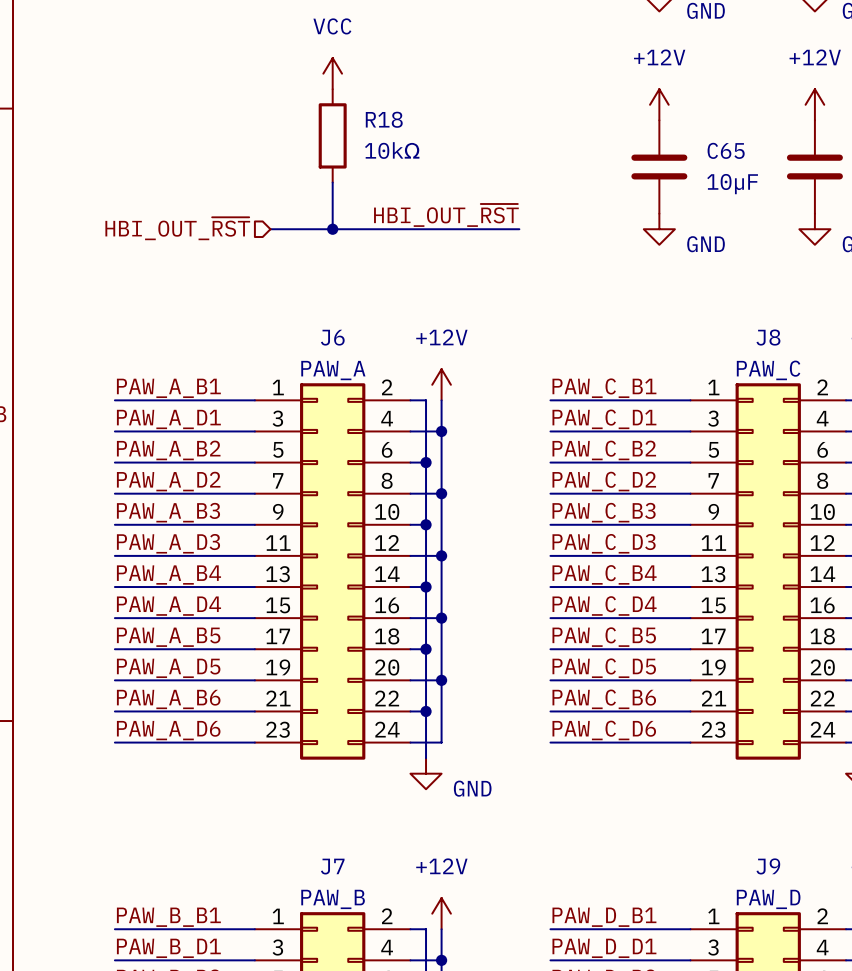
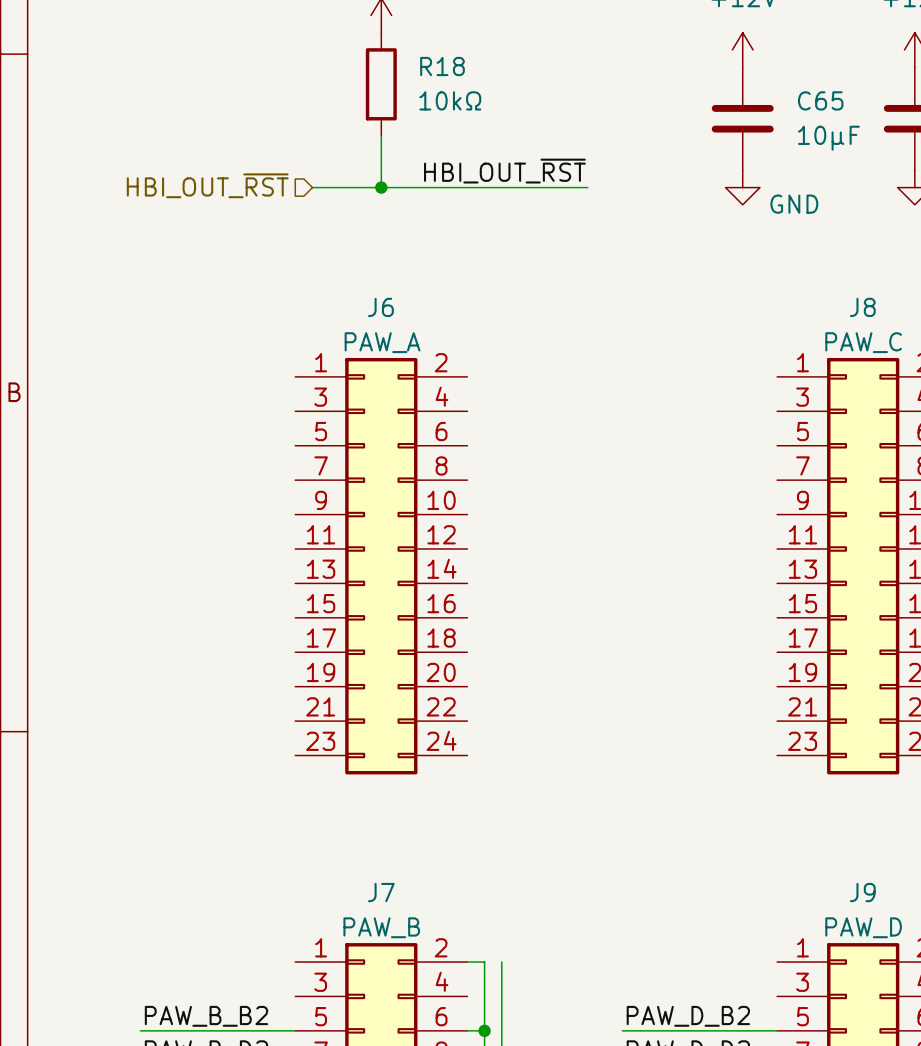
power symbol: +12V (441, 384) -> none
label: PAW_A_B1 (168, 388) -> none
label: PAW_C_B1 (604, 388) -> none
wire: (114, 400) (254, 400) -> none
wire: (410, 400) (426, 400) (426, 758) -> none
wire: (441, 400) (441, 742) (410, 742) -> none
wire: (550, 400) (690, 400) -> none
label: PAW_A_D1 (168, 419) -> none
label: PAW_C_D1 (604, 419) -> none
wire: (114, 431) (254, 431) -> none
wire: (410, 431) (441, 431) -> none
junction: (441, 431) -> none
wire: (550, 431) (690, 431) -> none
label: PAW_A_B2 (168, 450) -> none
label: PAW_C_B2 (604, 450) -> none
wire: (114, 462) (254, 462) -> none
wire: (410, 462) (426, 462) -> none
junction: (426, 462) -> none
wire: (550, 462) (690, 462) -> none
label: PAW_A_D2 (168, 481) -> none
label: PAW_C_D2 (604, 481) -> none
wire: (114, 493) (254, 493) -> none
wire: (410, 493) (441, 493) -> none
junction: (441, 493) -> none
wire: (550, 493) (690, 493) -> none
label: PAW_A_B3 (168, 512) -> none
label: PAW_C_B3 (604, 512) -> none
wire: (114, 524) (254, 524) -> none
wire: (410, 524) (426, 524) -> none
junction: (426, 524) -> none
wire: (550, 524) (690, 524) -> none
label: PAW_A_D3 (168, 543) -> none
label: PAW_C_D3 (604, 543) -> none
wire: (114, 555) (254, 555) -> none
wire: (410, 555) (441, 555) -> none
junction: (441, 555) -> none
wire: (550, 555) (690, 555) -> none
label: PAW_C_B4 (604, 574) -> none
label: PAW_A_B4 (168, 575) -> none
wire: (114, 587) (254, 587) -> none
wire: (410, 587) (426, 587) -> none
junction: (426, 587) -> none
wire: (550, 587) (690, 587) -> none
label: PAW_C_D4 (604, 605) -> none
label: PAW_A_D4 (168, 606) -> none
wire: (114, 618) (254, 618) -> none
wire: (410, 618) (441, 618) -> none
junction: (441, 618) -> none
wire: (550, 618) (690, 618) -> none
label: PAW_A_B5 (168, 637) -> none
label: PAW_C_B5 (604, 637) -> none
wire: (114, 649) (254, 649) -> none
wire: (410, 649) (426, 649) -> none
junction: (426, 649) -> none
wire: (550, 649) (690, 649) -> none
label: PAW_A_D5 (168, 668) -> none
label: PAW_C_D5 (604, 668) -> none
wire: (114, 680) (254, 680) -> none
wire: (410, 680) (441, 680) -> none
junction: (441, 680) -> none
wire: (550, 680) (690, 680) -> none
label: PAW_A_B6 (168, 699) -> none
label: PAW_C_B6 (604, 699) -> none
wire: (114, 711) (254, 711) -> none
wire: (410, 711) (426, 711) -> none
junction: (426, 711) -> none
wire: (550, 711) (690, 711) -> none
label: PAW_A_D6 (168, 730) -> none
label: PAW_C_D6 (604, 730) -> none
wire: (114, 742) (254, 742) -> none
wire: (550, 742) (690, 742) -> none
power symbol: GND (426, 773) -> none
power symbol: +12V (441, 913) -> none
label: PAW_B_B1 (168, 917) -> none
label: PAW_D_B1 (604, 917) -> none
wire: (114, 929) (254, 929) -> none
wire: (550, 929) (690, 929) -> none
label: PAW_B_D1 (168, 948) -> none
label: PAW_D_D1 (604, 948) -> none
wire: (114, 960) (254, 960) -> none
wire: (410, 960) (441, 960) -> none
junction: (441, 960) -> none
wire: (550, 960) (690, 960) -> none

